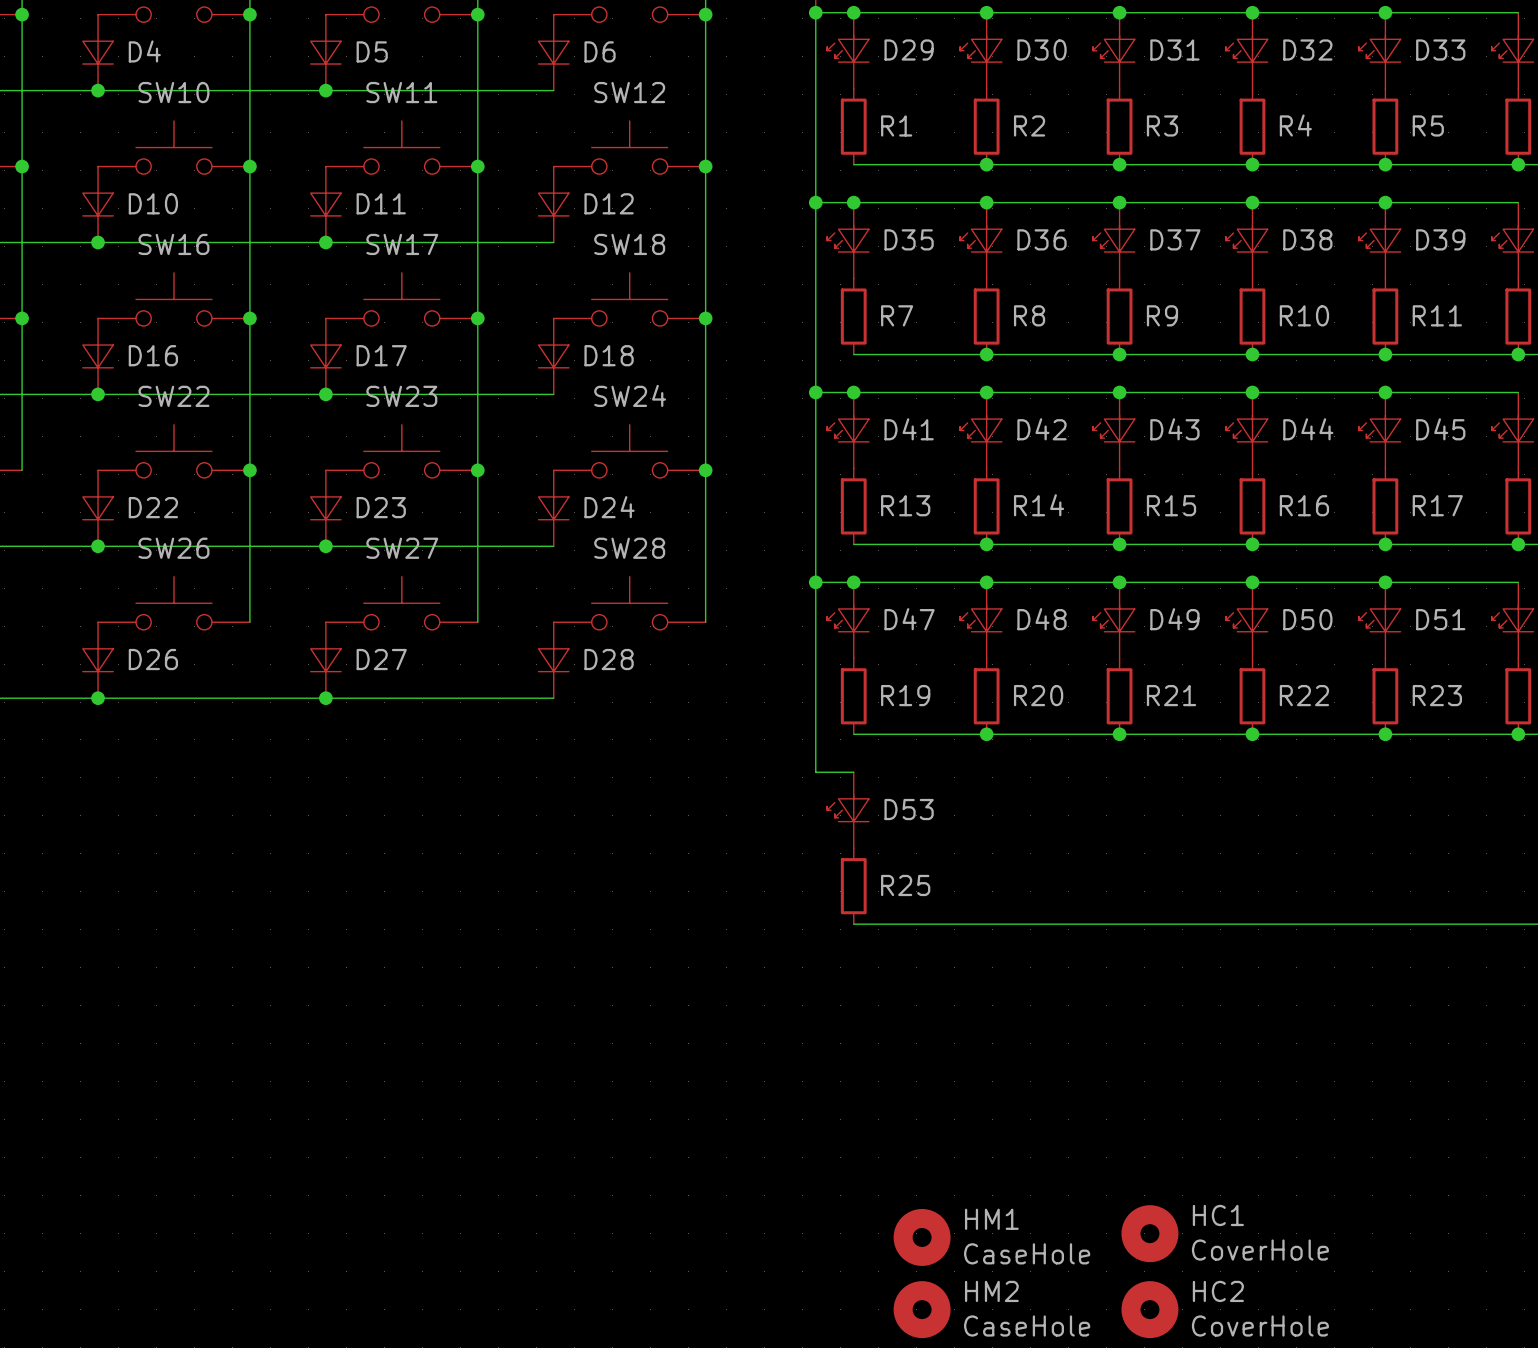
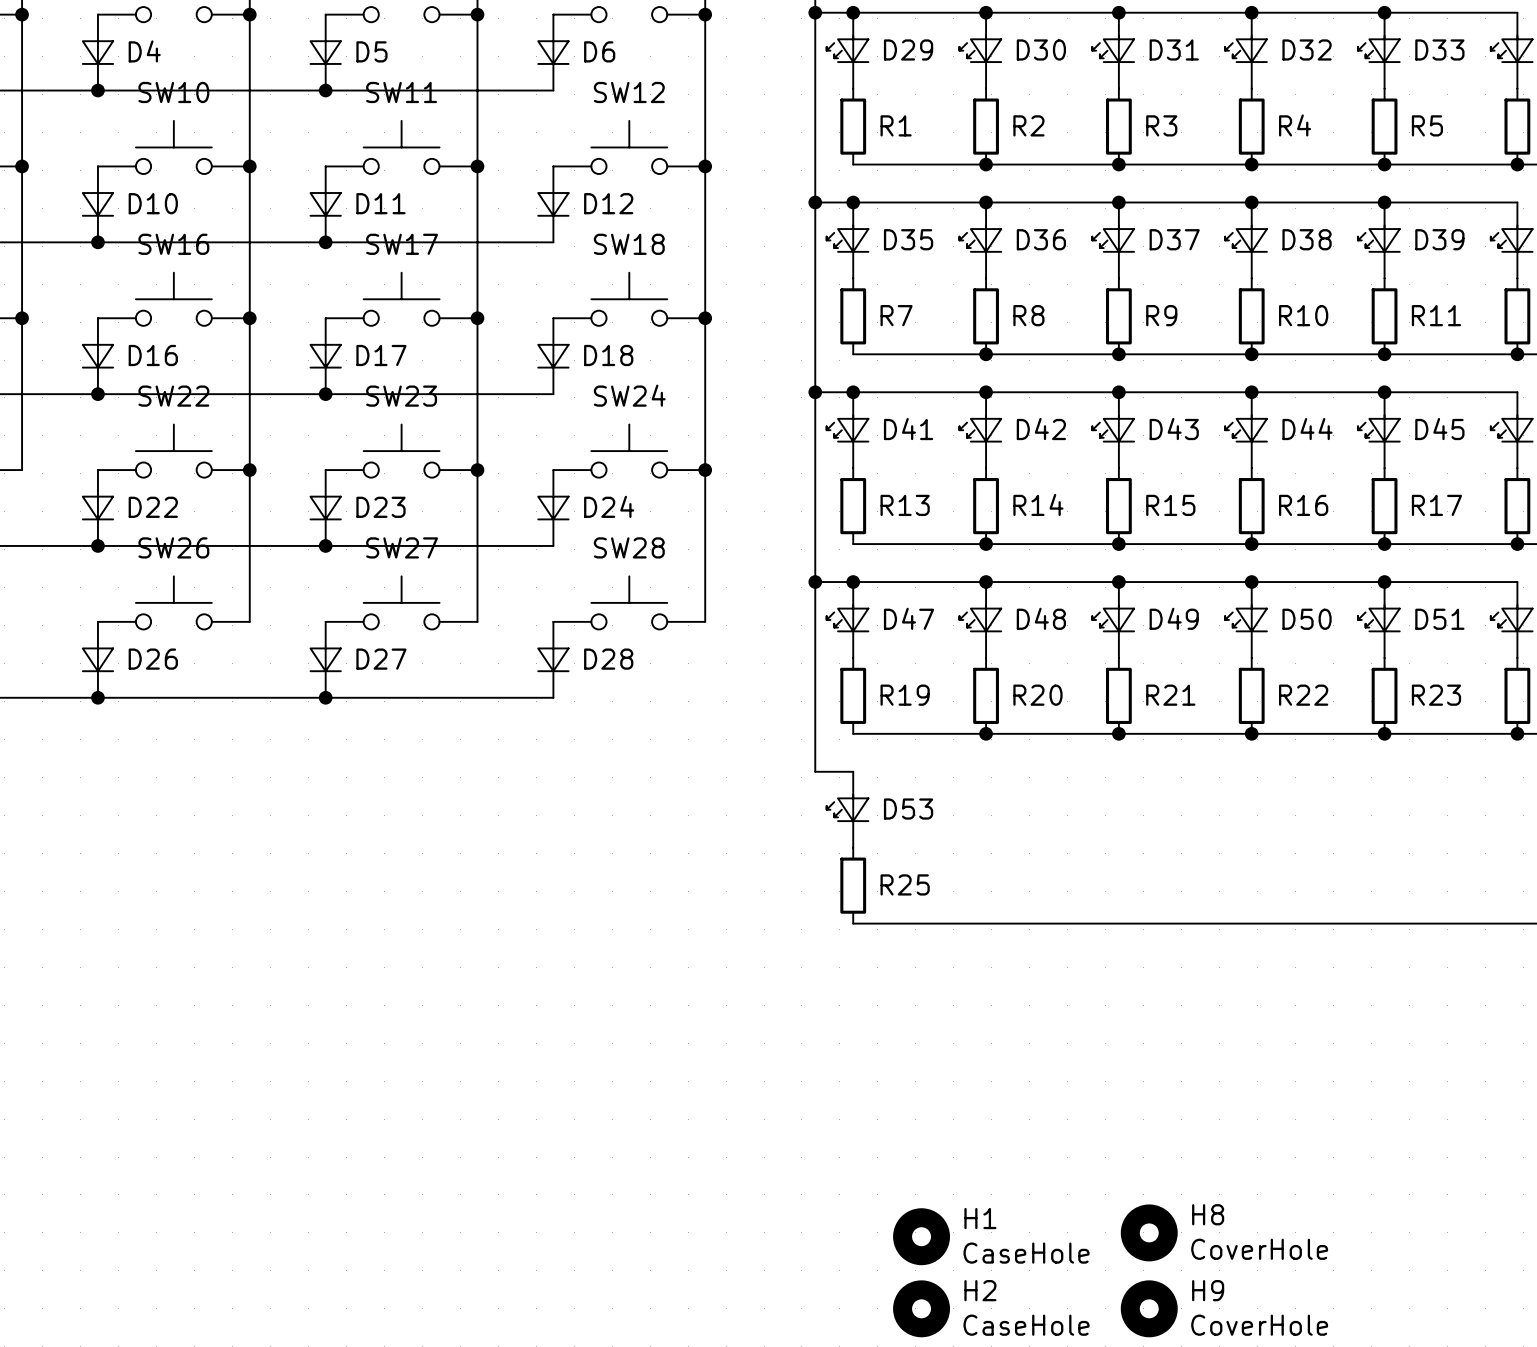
HC1 name: HC1 (1218, 1215) -> H8 (1208, 1214)
HM1 name: HM1 (991, 1219) -> H1 (980, 1218)
HM2 name: HM2 (991, 1291) -> H2 (980, 1290)
HC2 name: HC2 (1218, 1291) -> H9 (1208, 1290)

